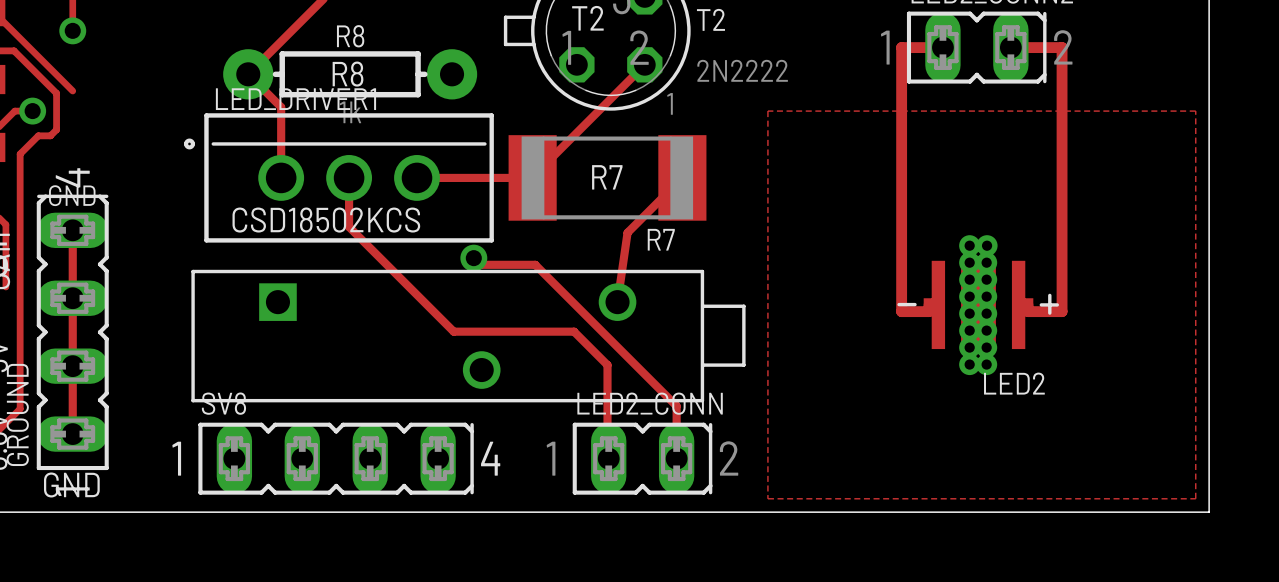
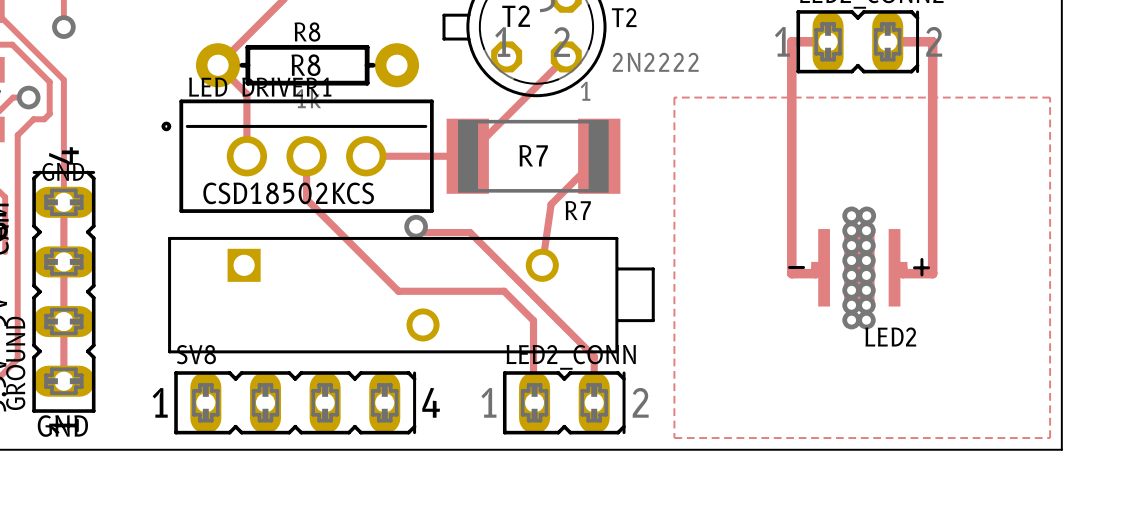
track: none -> (63, 79) (63, 202)

